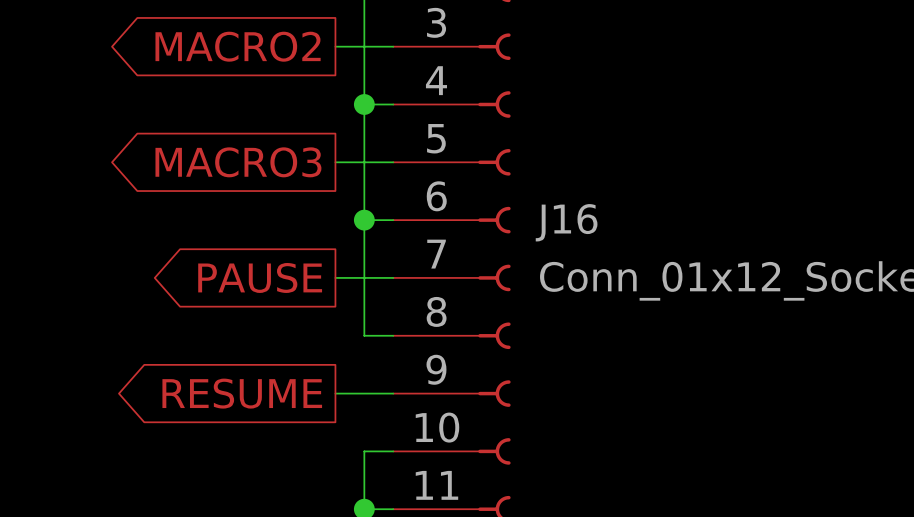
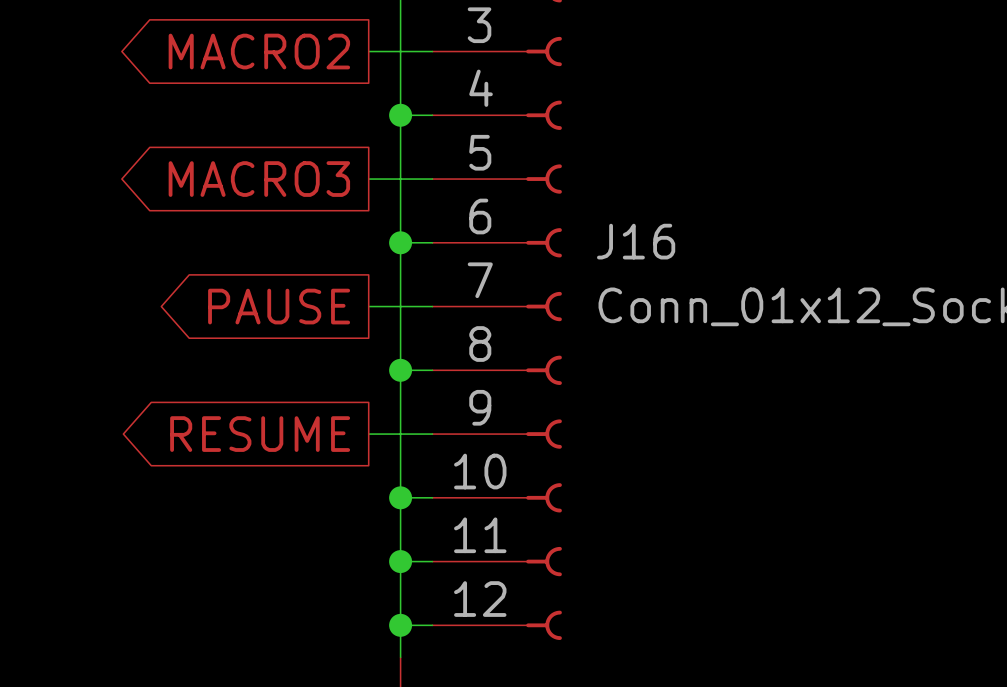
wire: none -> (400, 370) (400, 497)
junction: none -> (400, 370)
junction: none -> (400, 497)

